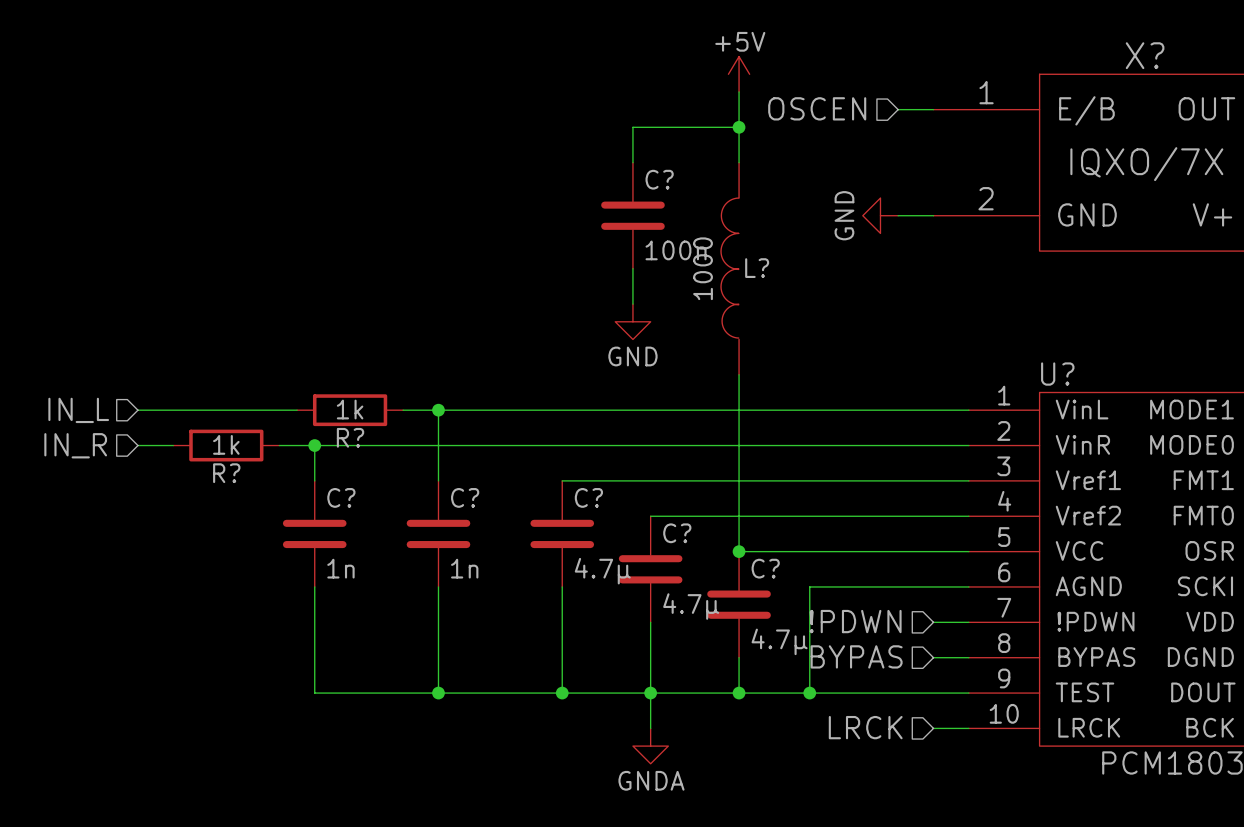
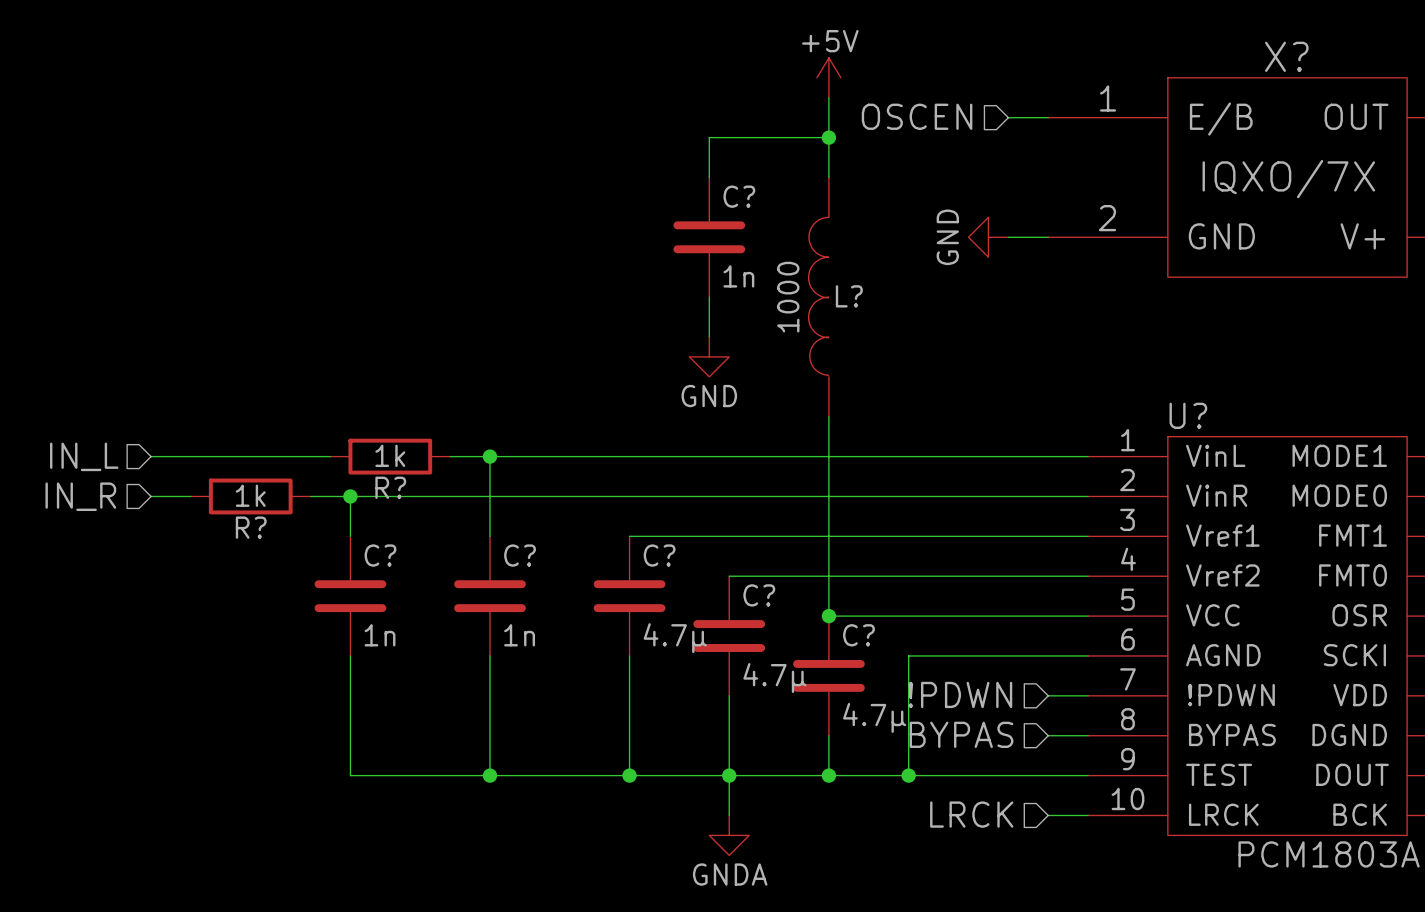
C? value: 100n (676, 250) -> 1n (738, 276)

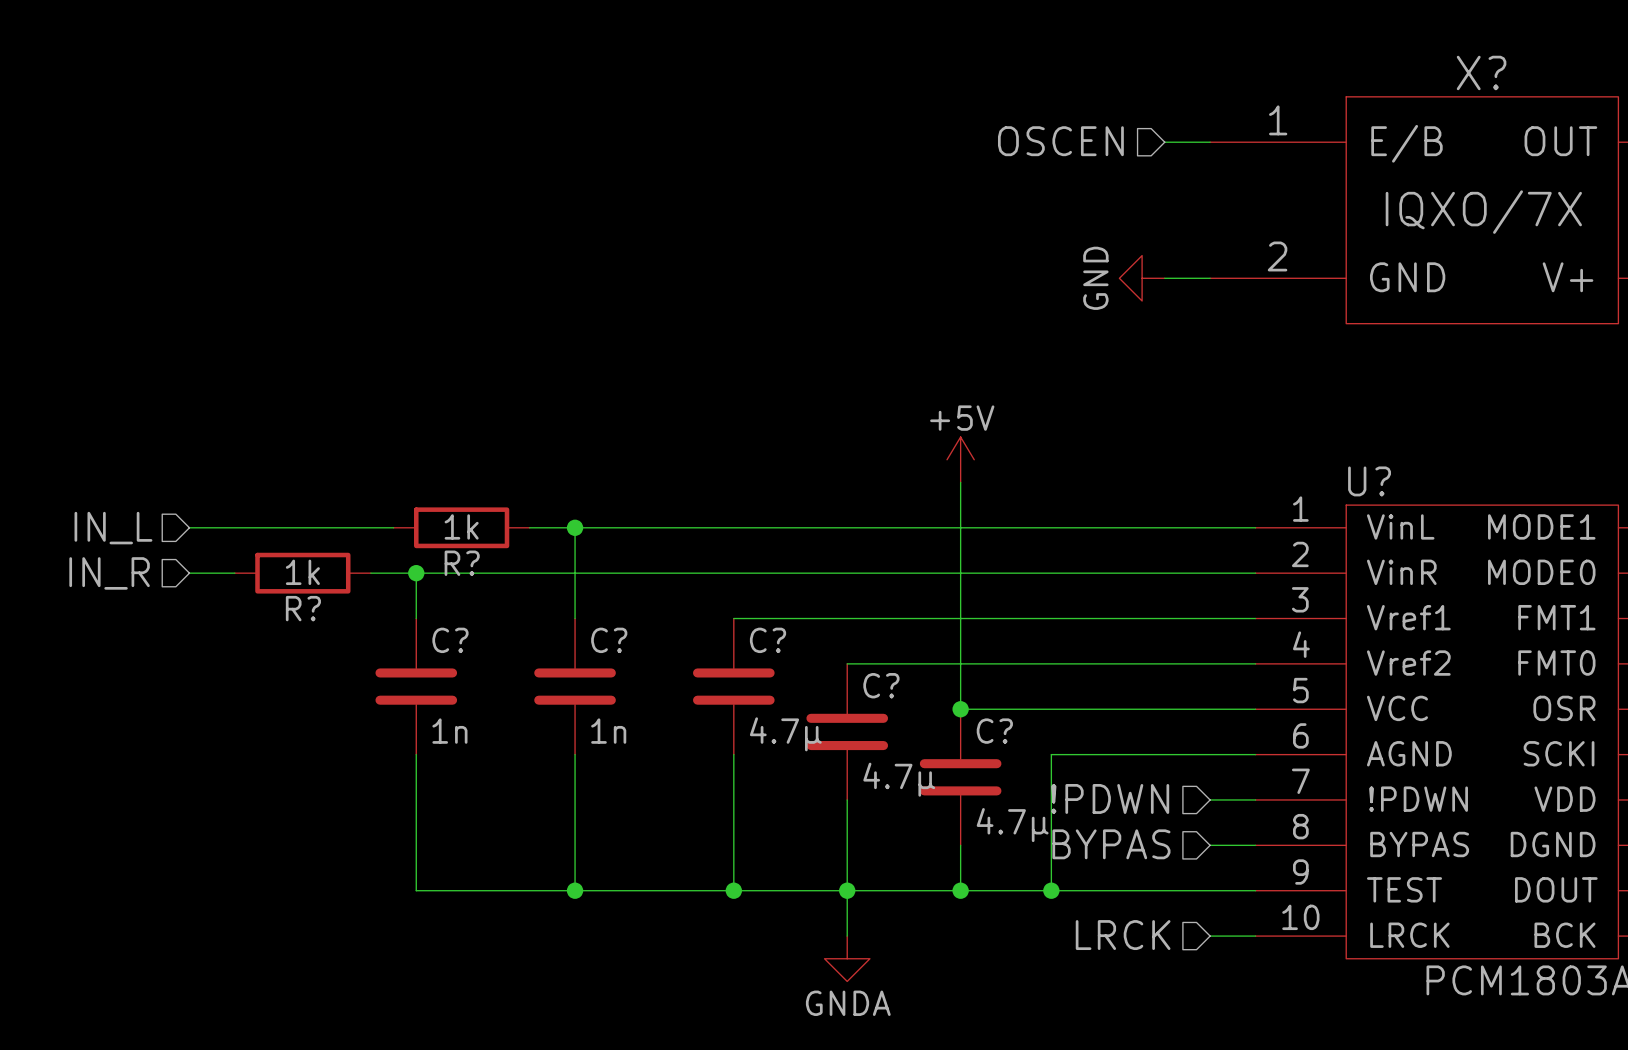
power symbol position: +5V (828, 77) -> +5V (960, 459)
wire: (828, 97) (828, 177) -> none
wire: (828, 137) (709, 137) (709, 177) -> none
junction: (828, 137) -> none
C?: 1n (709, 237) -> none
wire: (709, 297) (709, 336) -> none
L?: 1000 (818, 297) -> none
power symbol: GND (709, 356) -> none

